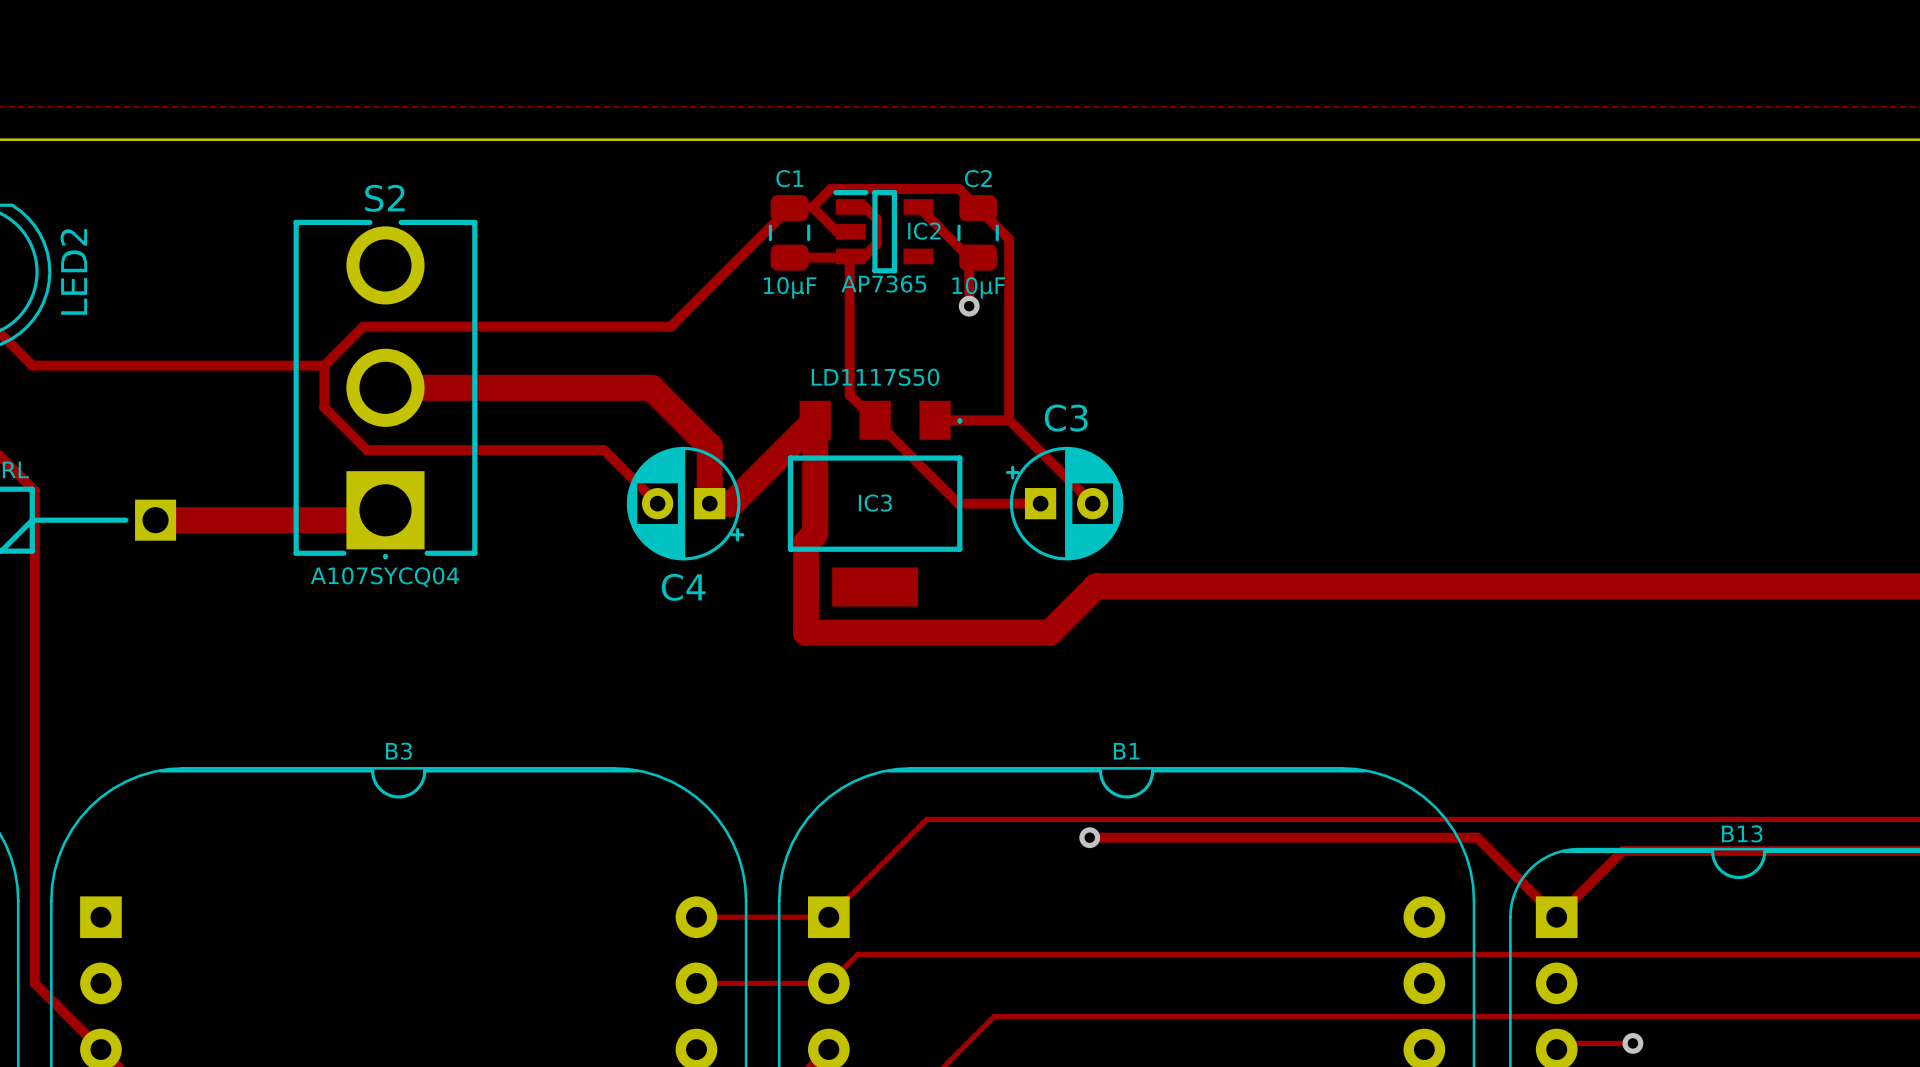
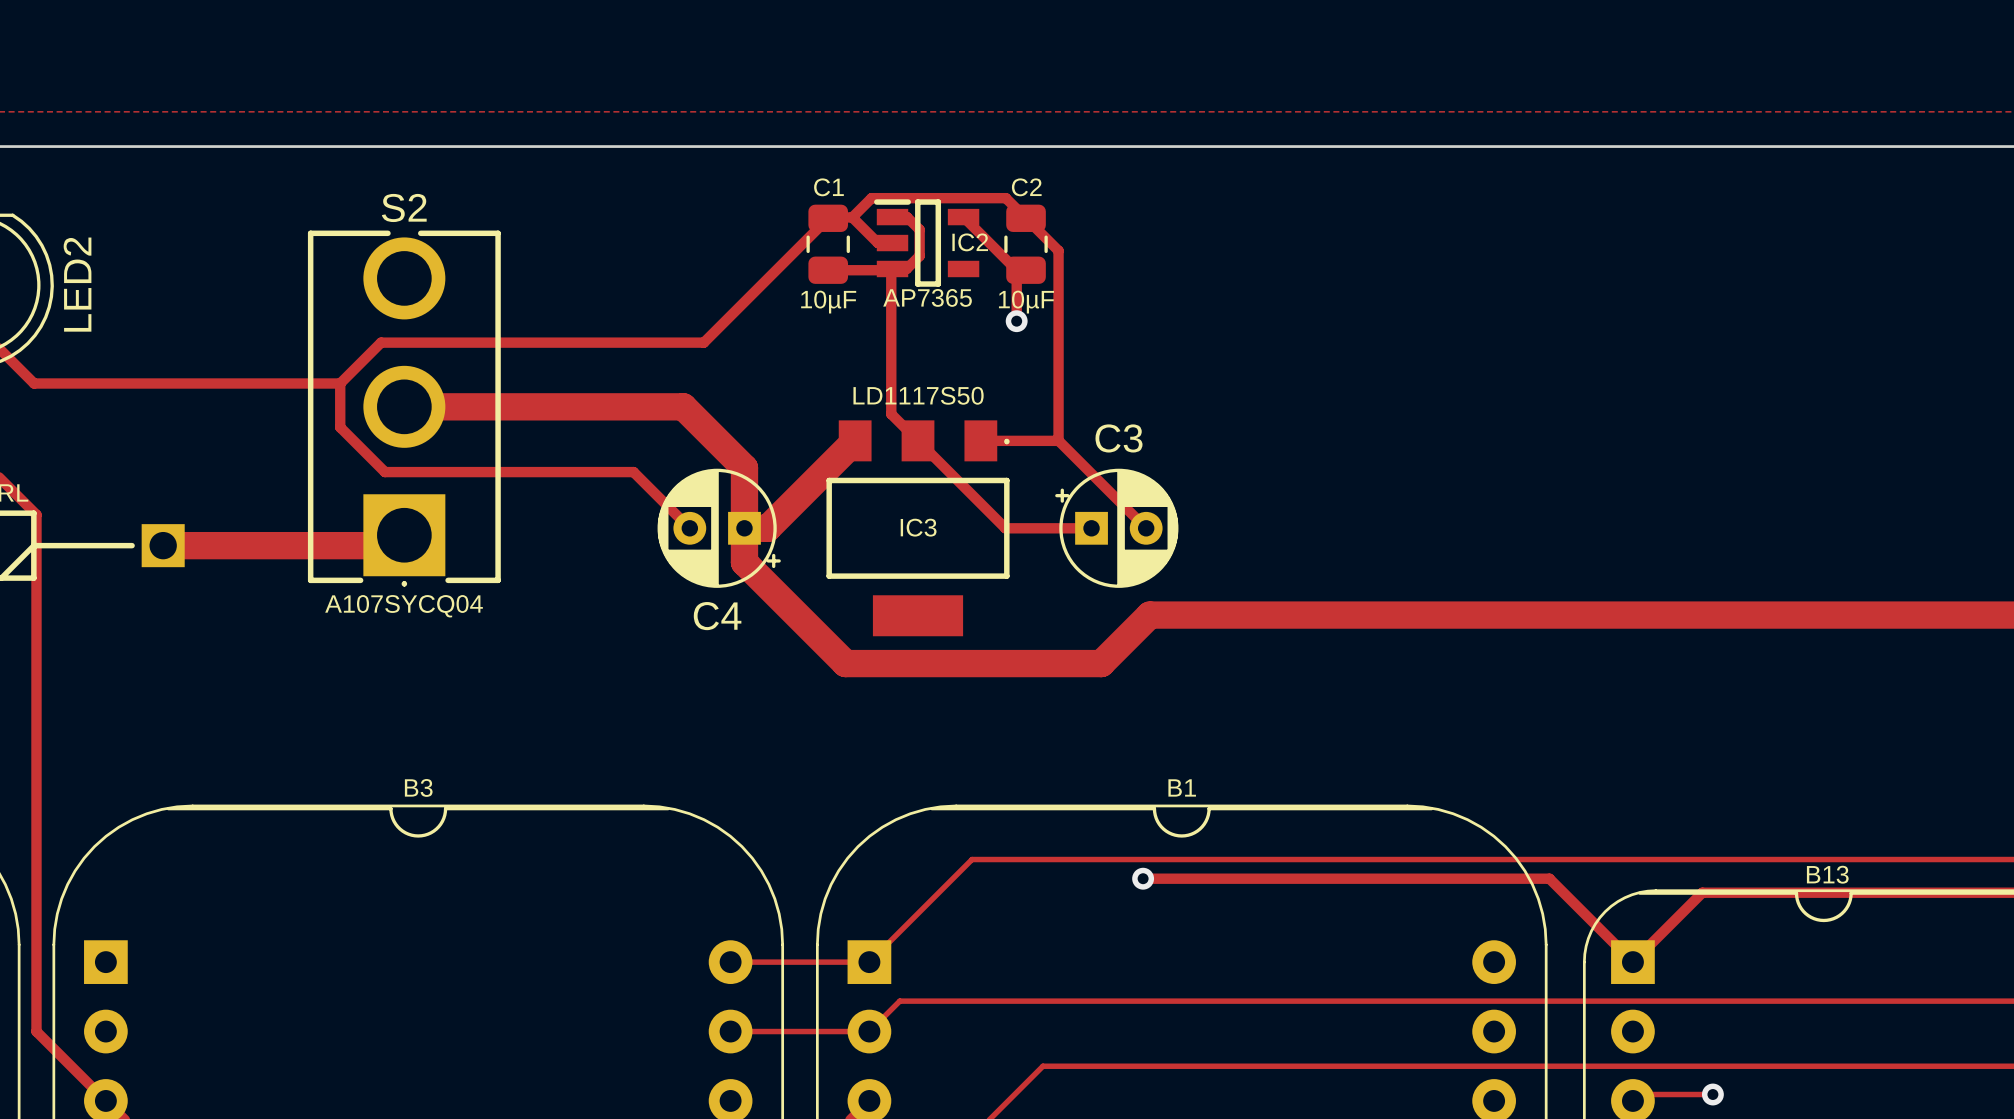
track: (815, 420) (815, 533) (806, 542) (806, 632) -> (744, 528) (744, 562) (845, 663)

